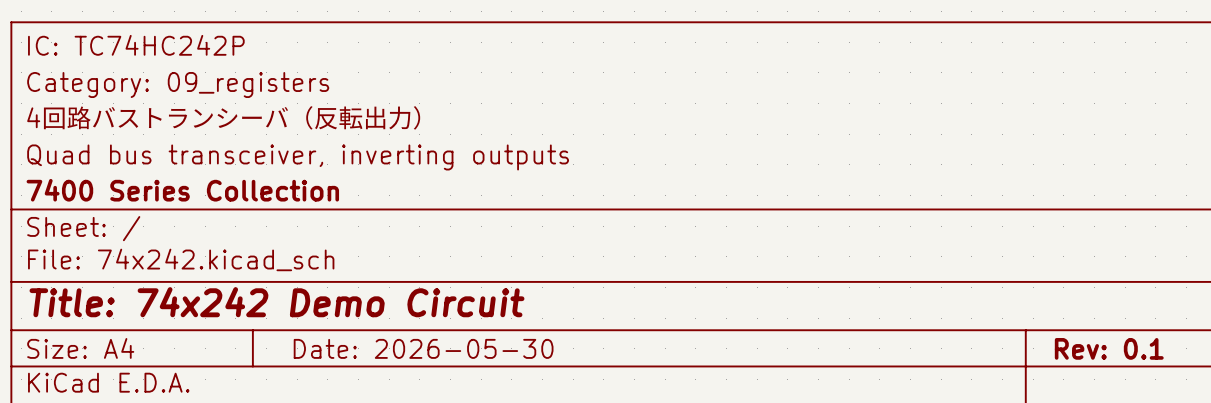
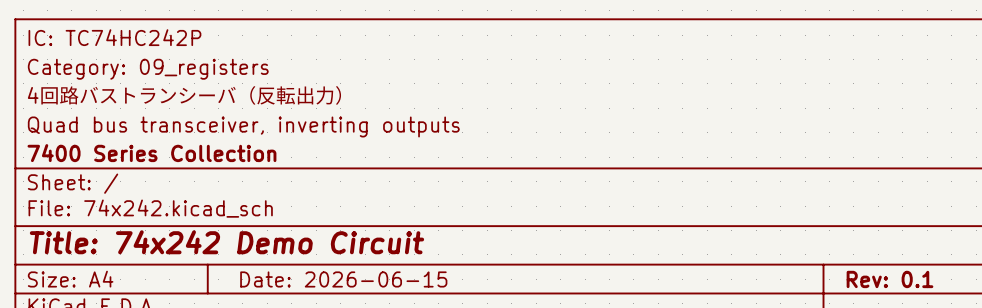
title block: Date: 2026-05-30 (423, 348) -> Date: 2026-06-15 (343, 279)

